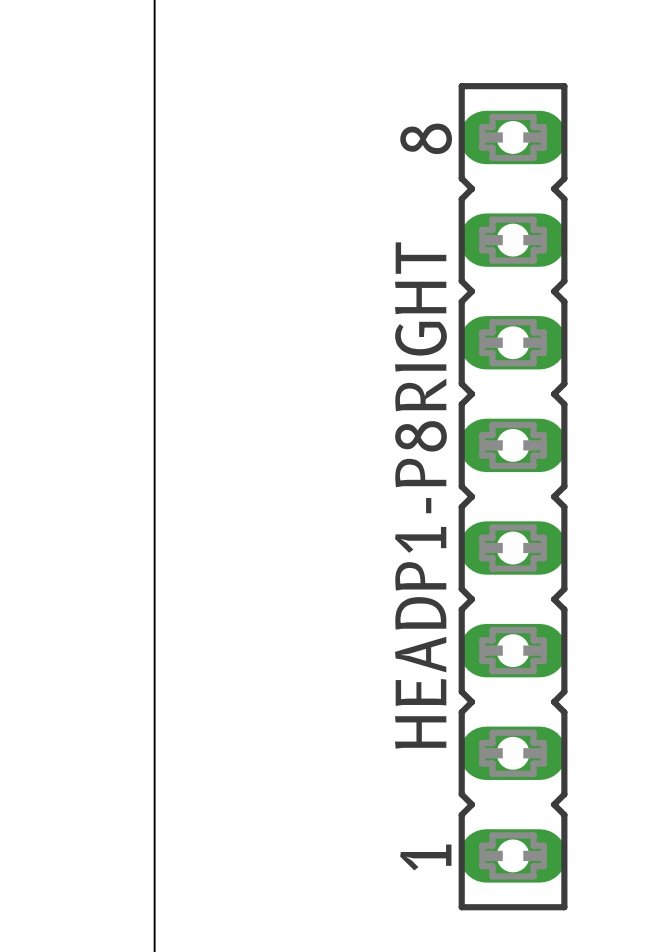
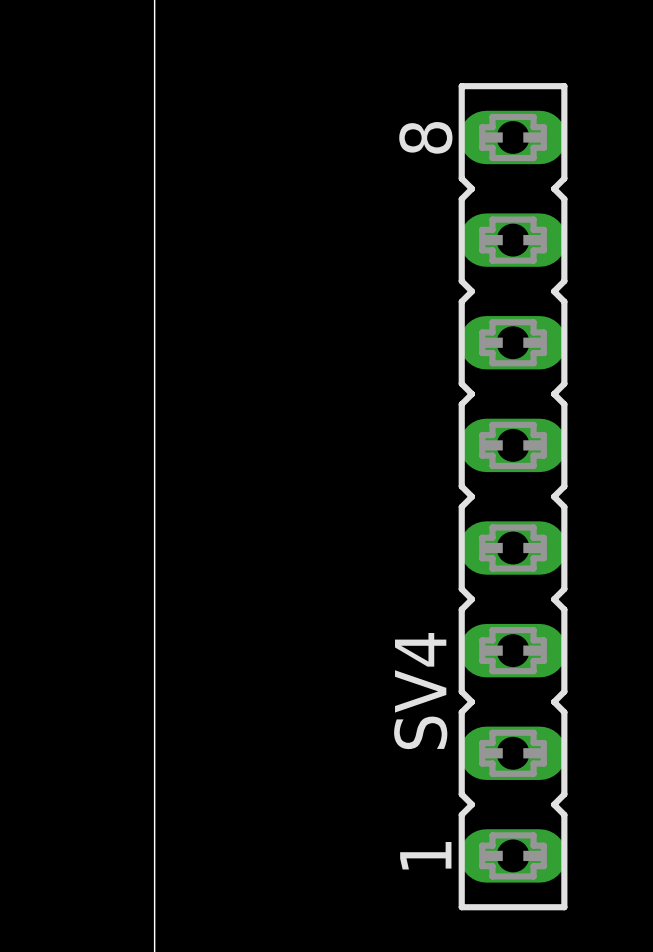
HEADP1-P8RIGHT name: HEADP1-P8RIGHT (420, 495) -> SV4 (420, 691)

